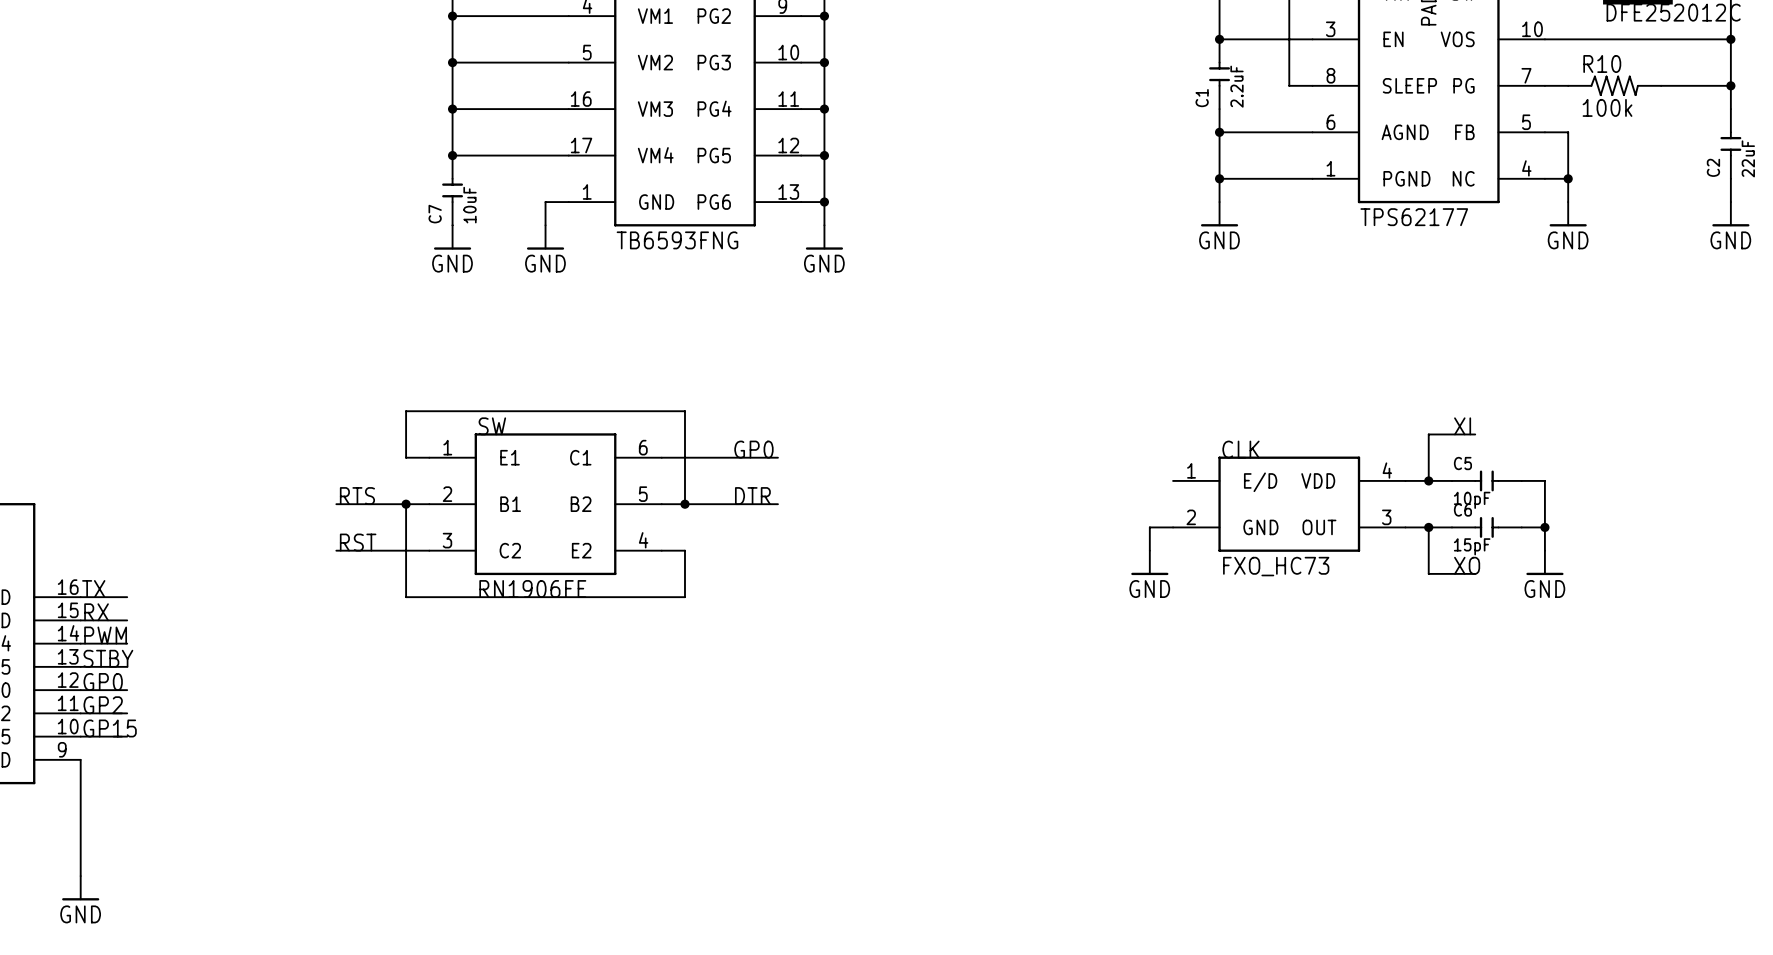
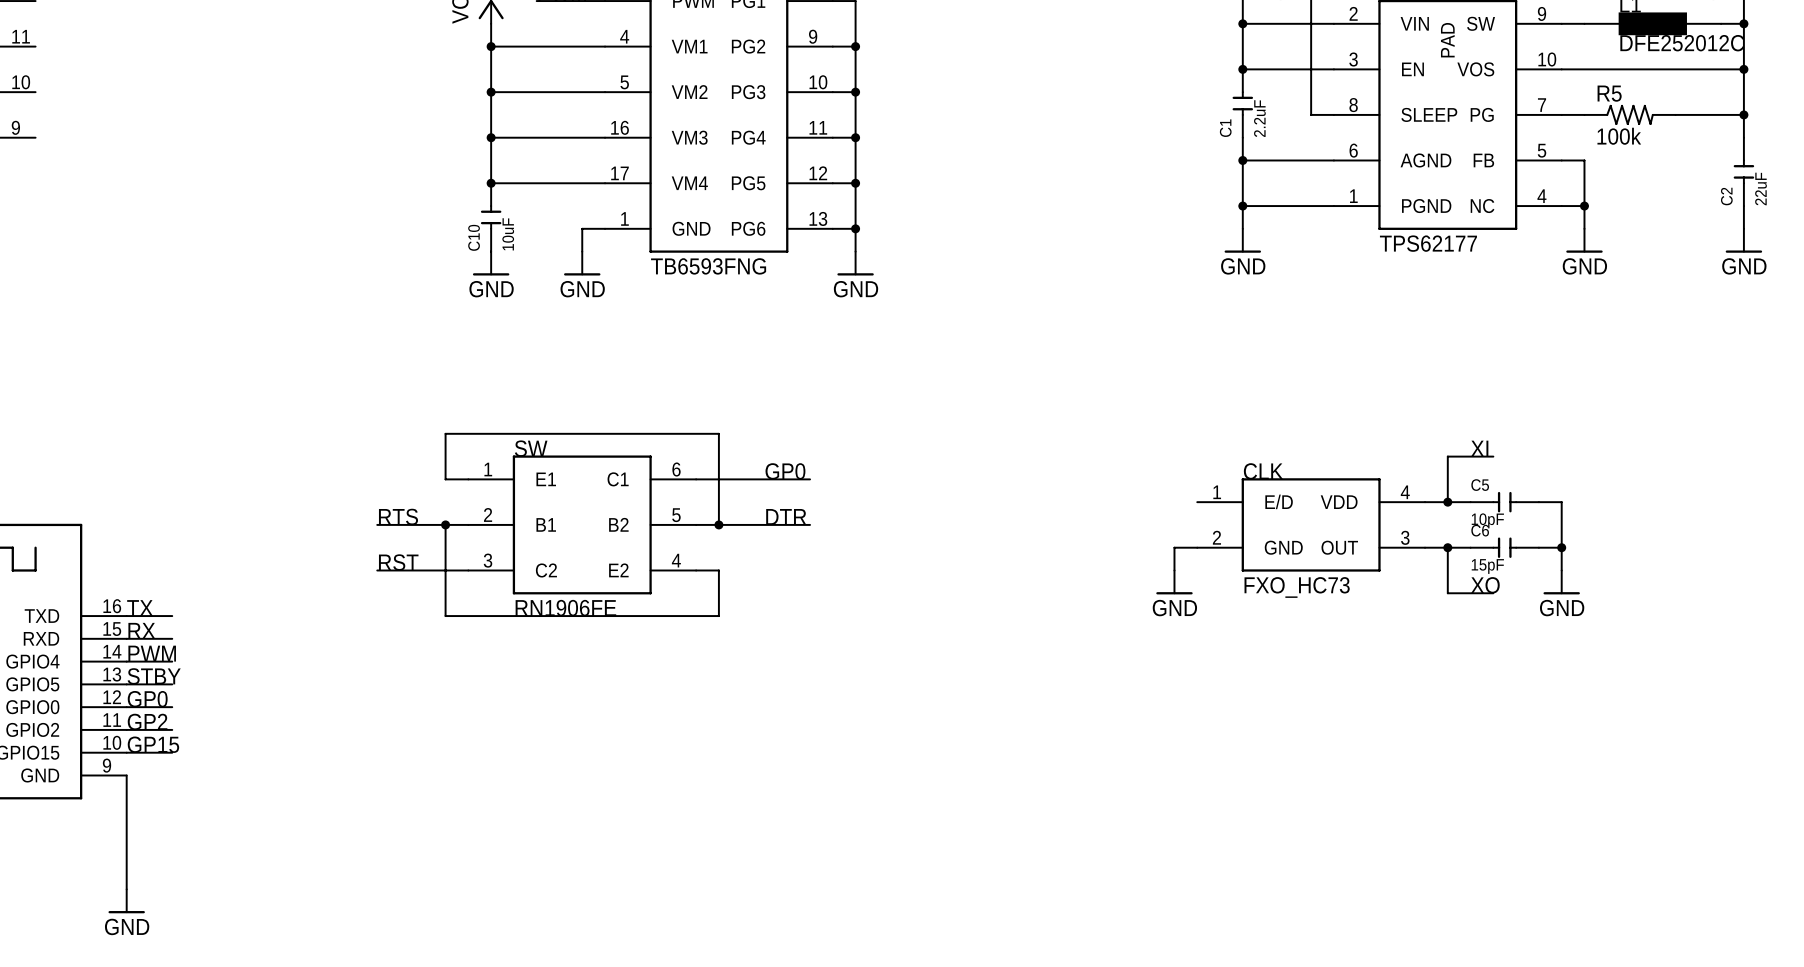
R10 name: R10 (1602, 63) -> R5 (1609, 93)
C7 name: C7 (435, 214) -> C10 (474, 237)

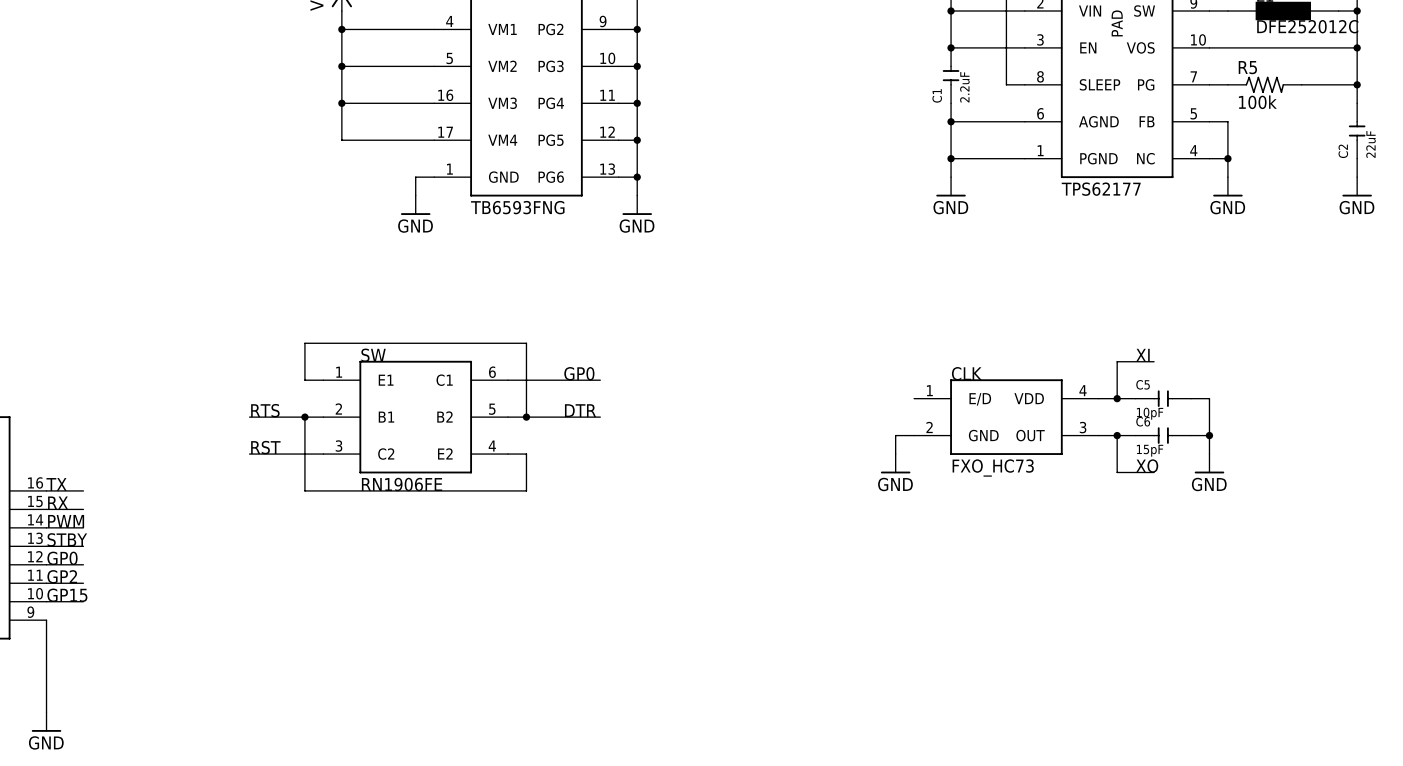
junction: (491, 183) -> none
C10: 10uF (491, 217) -> none
power symbol: GND (491, 263) -> none

